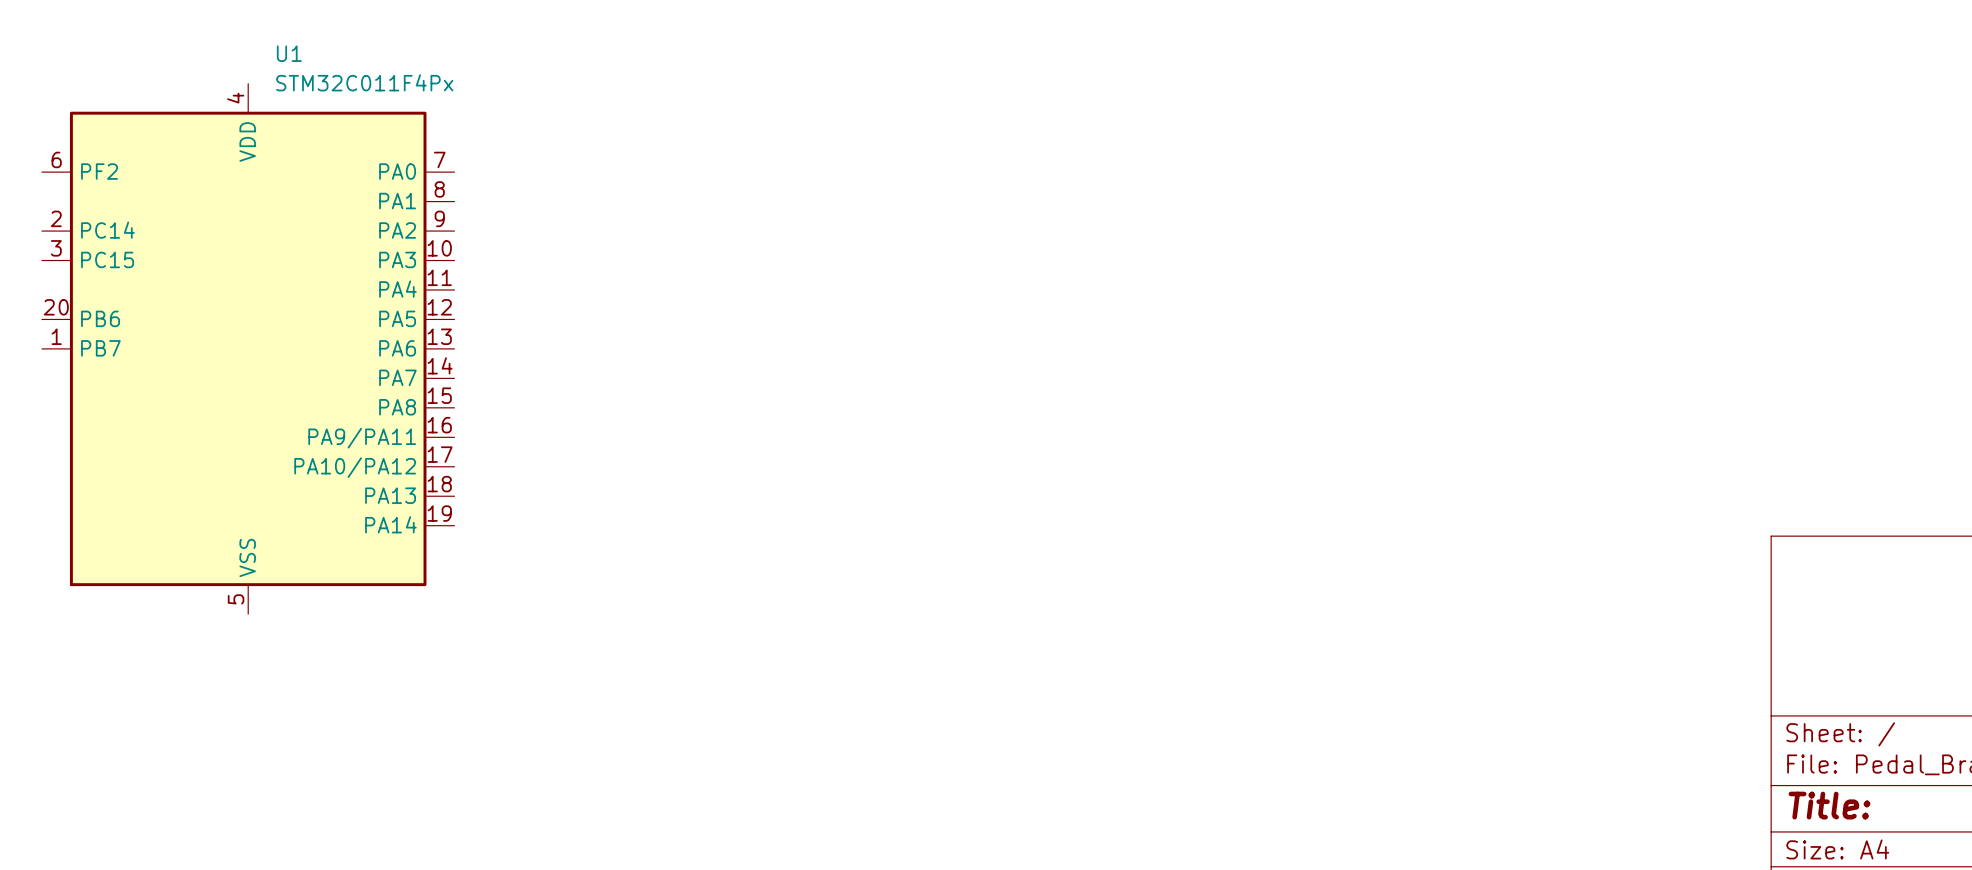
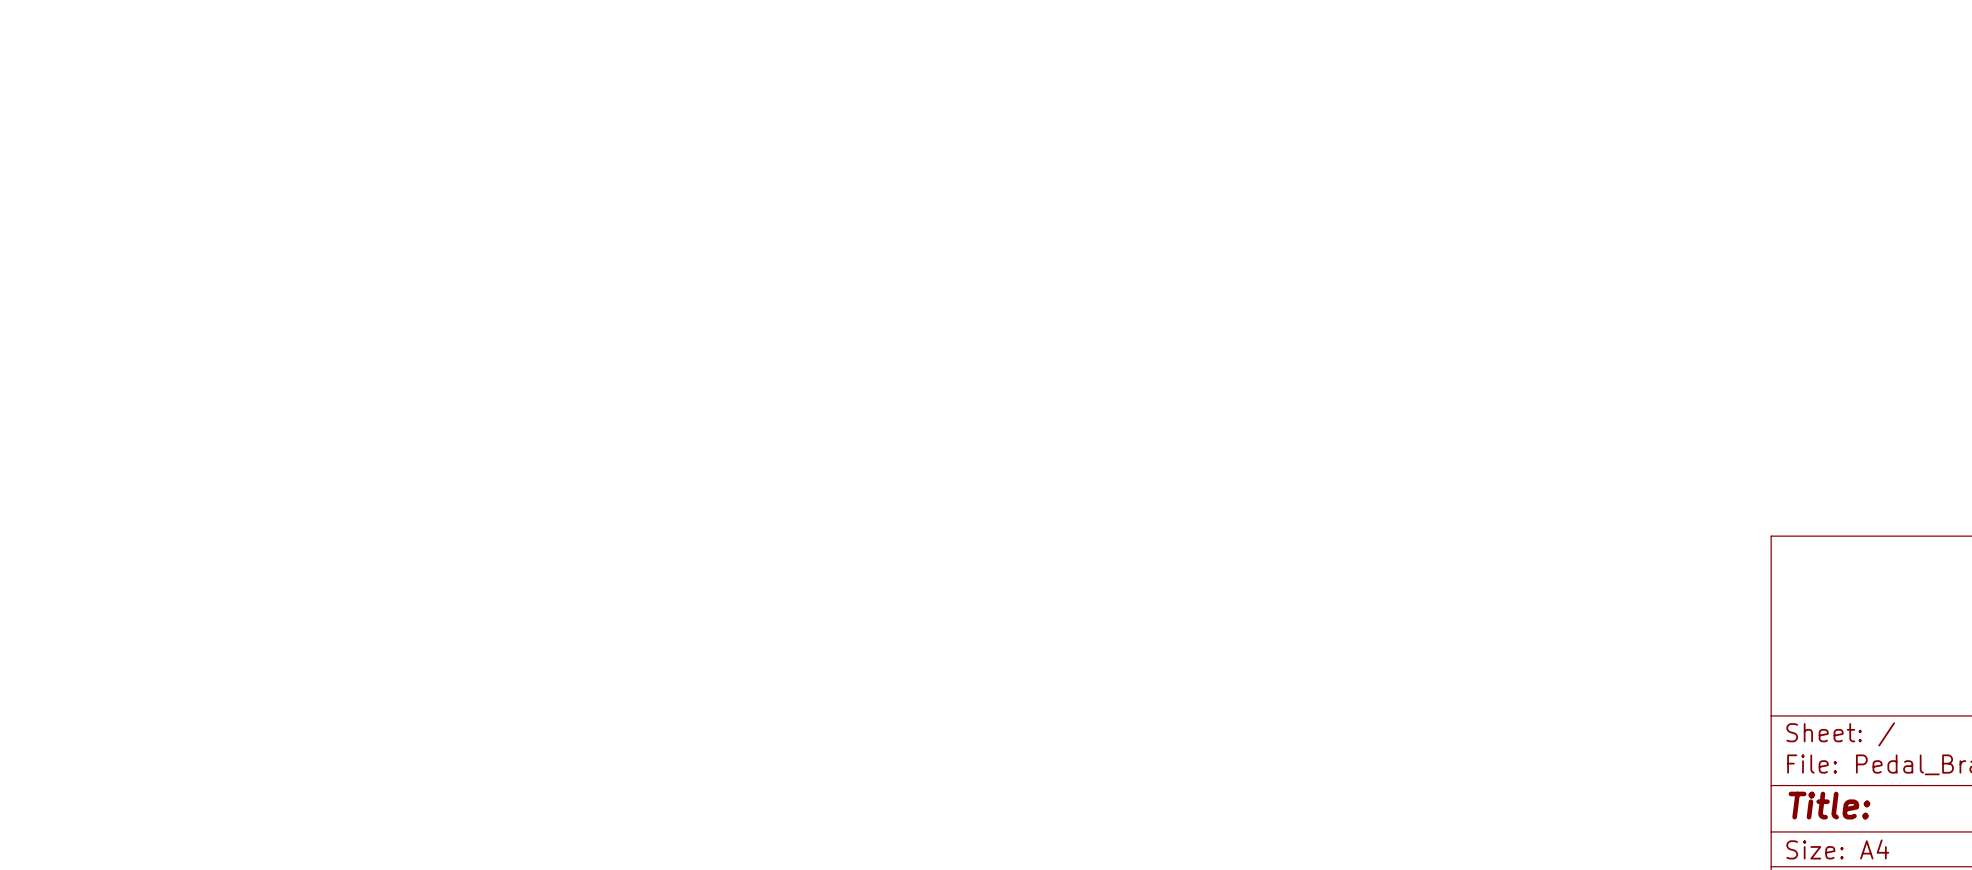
U1: STM32C011F4Px (248, 348) -> none

